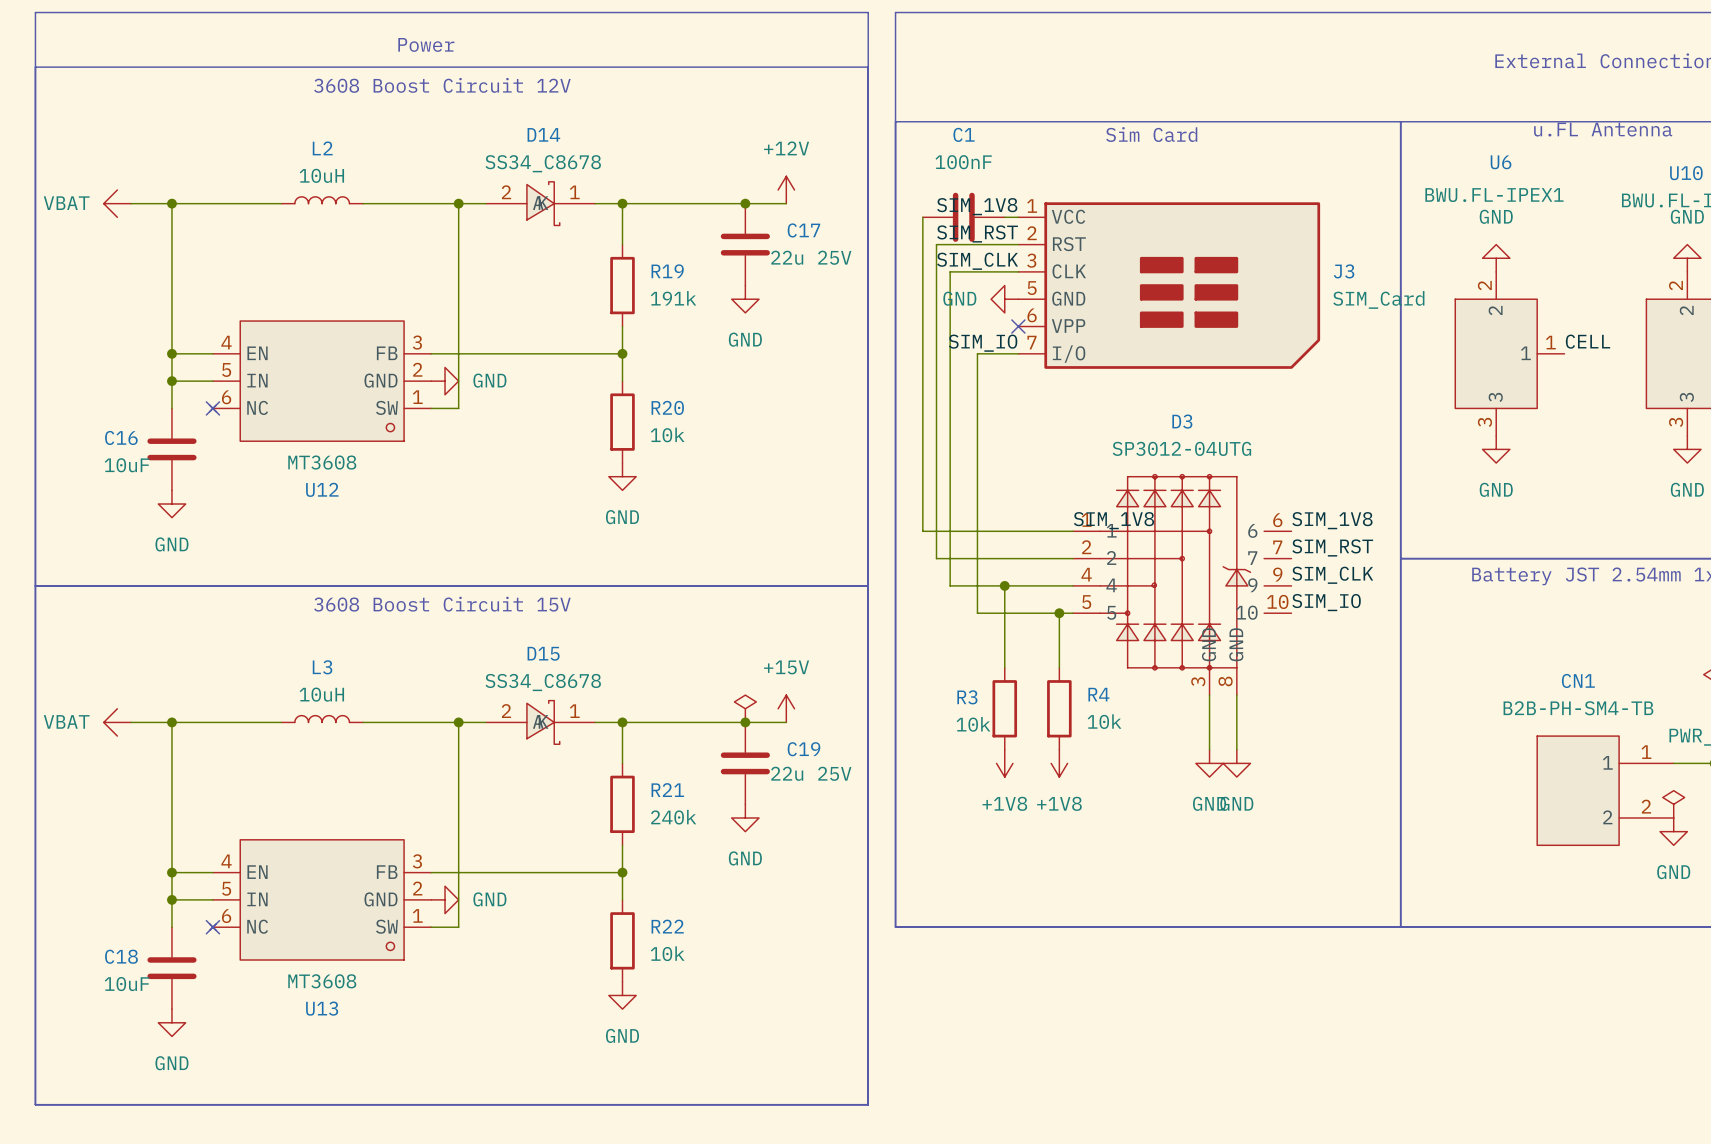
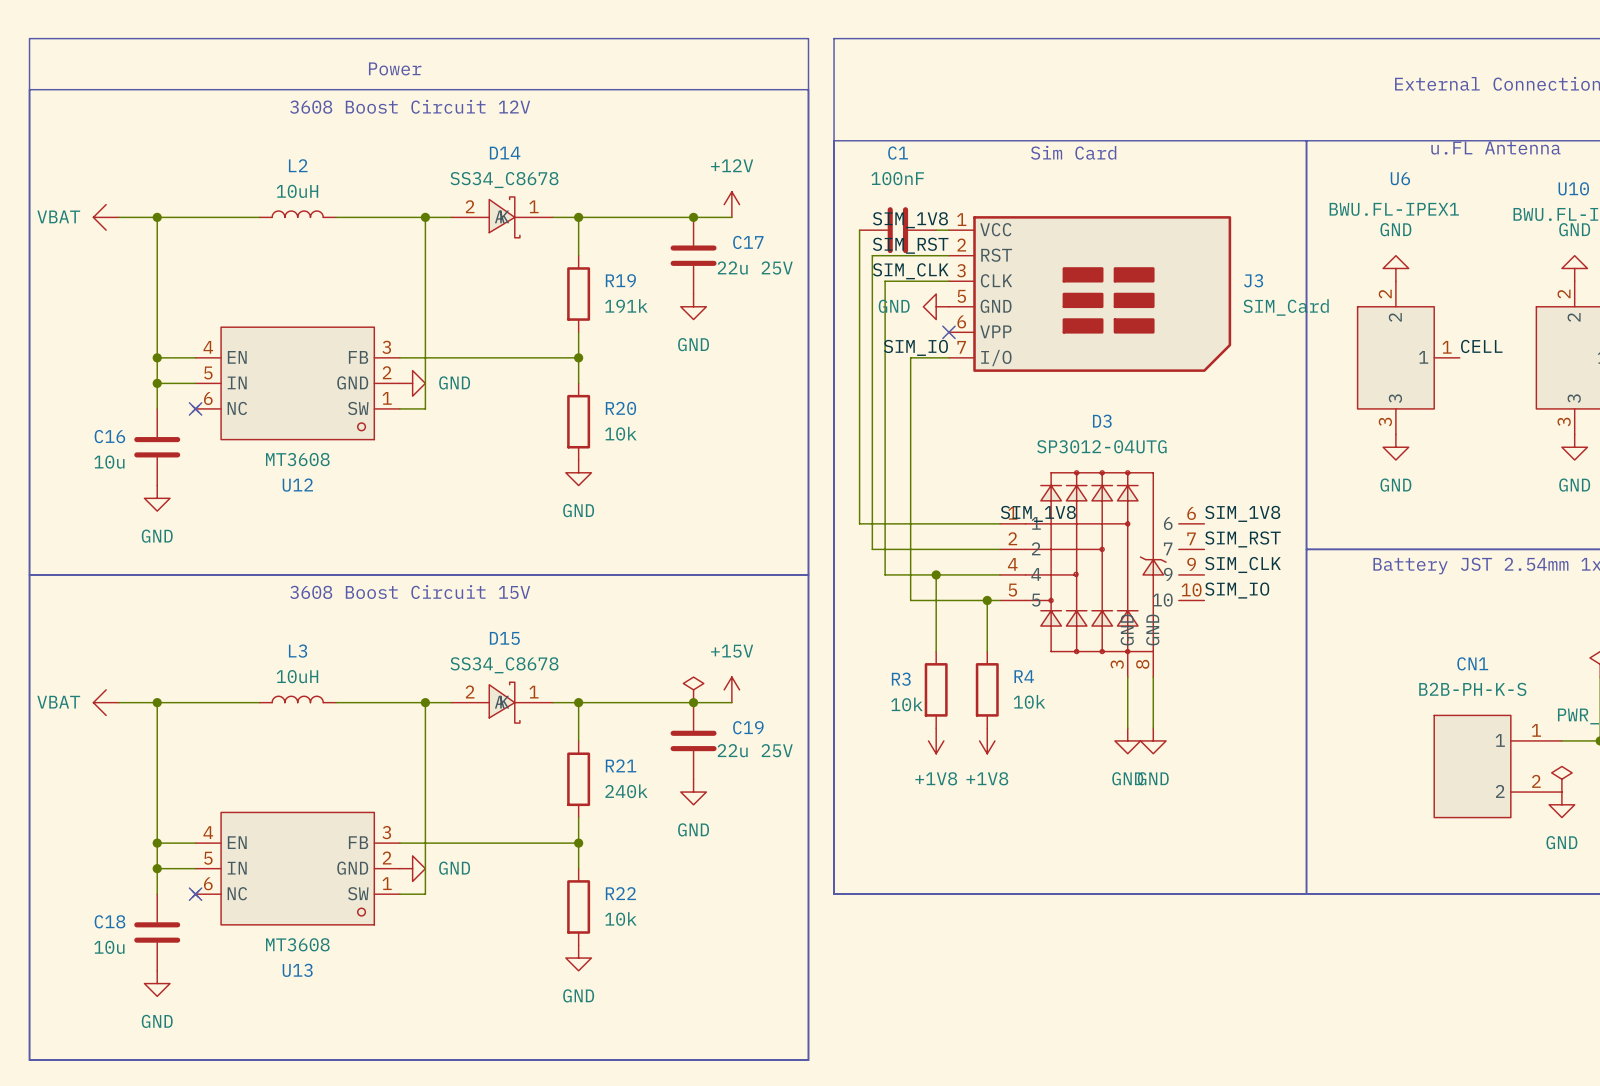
C16 value: 10uF (127, 465) -> 10u (109, 462)
CN1 value: B2B-PH-SM4-TB (1578, 708) -> B2B-PH-K-S (1472, 689)
C18 value: 10uF (127, 984) -> 10u (109, 947)

